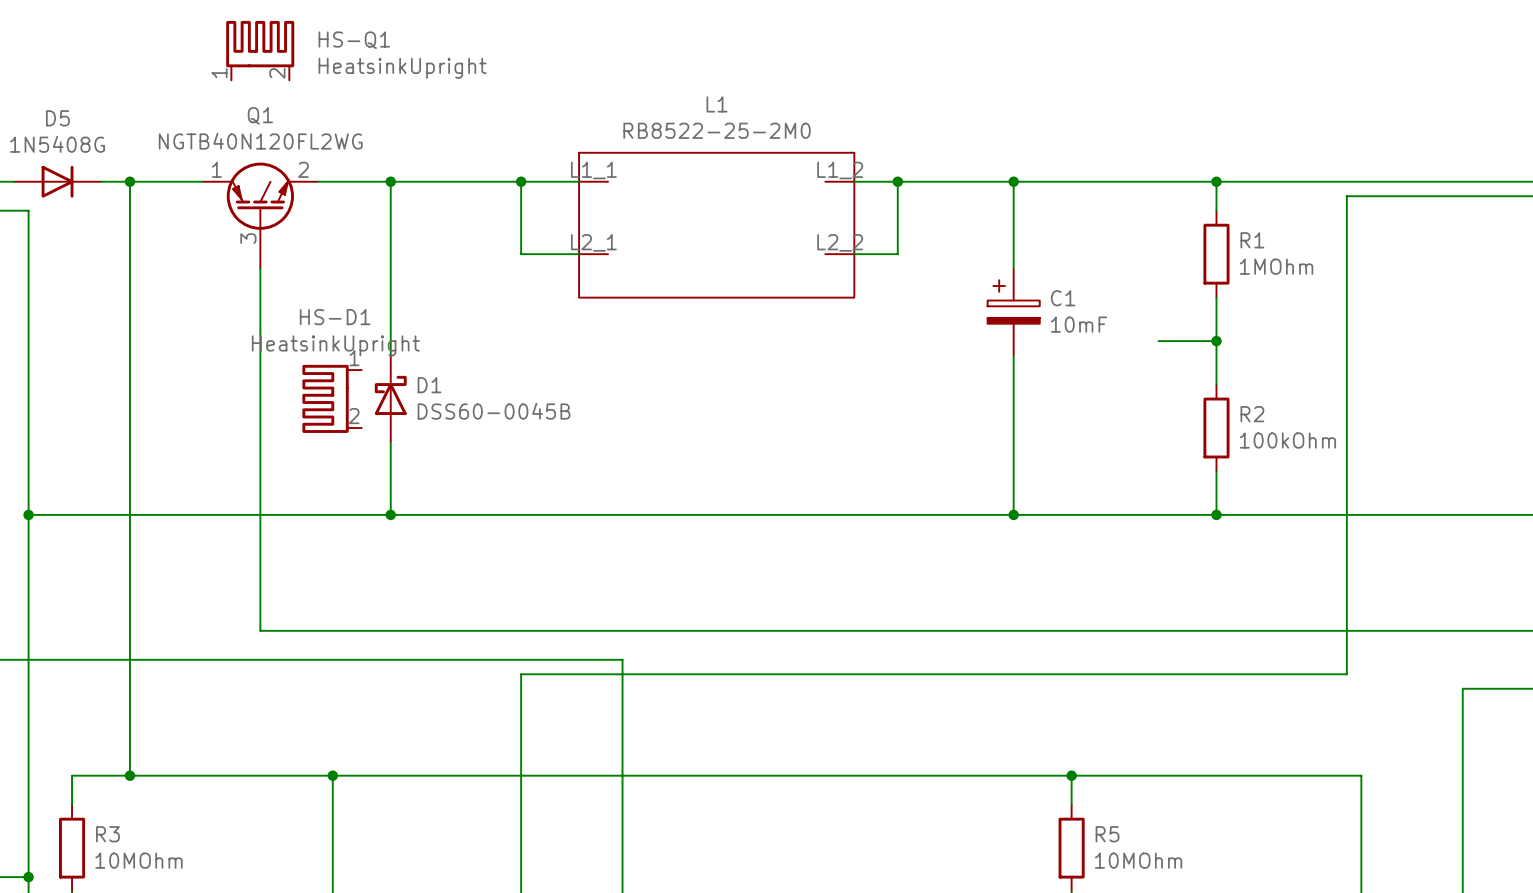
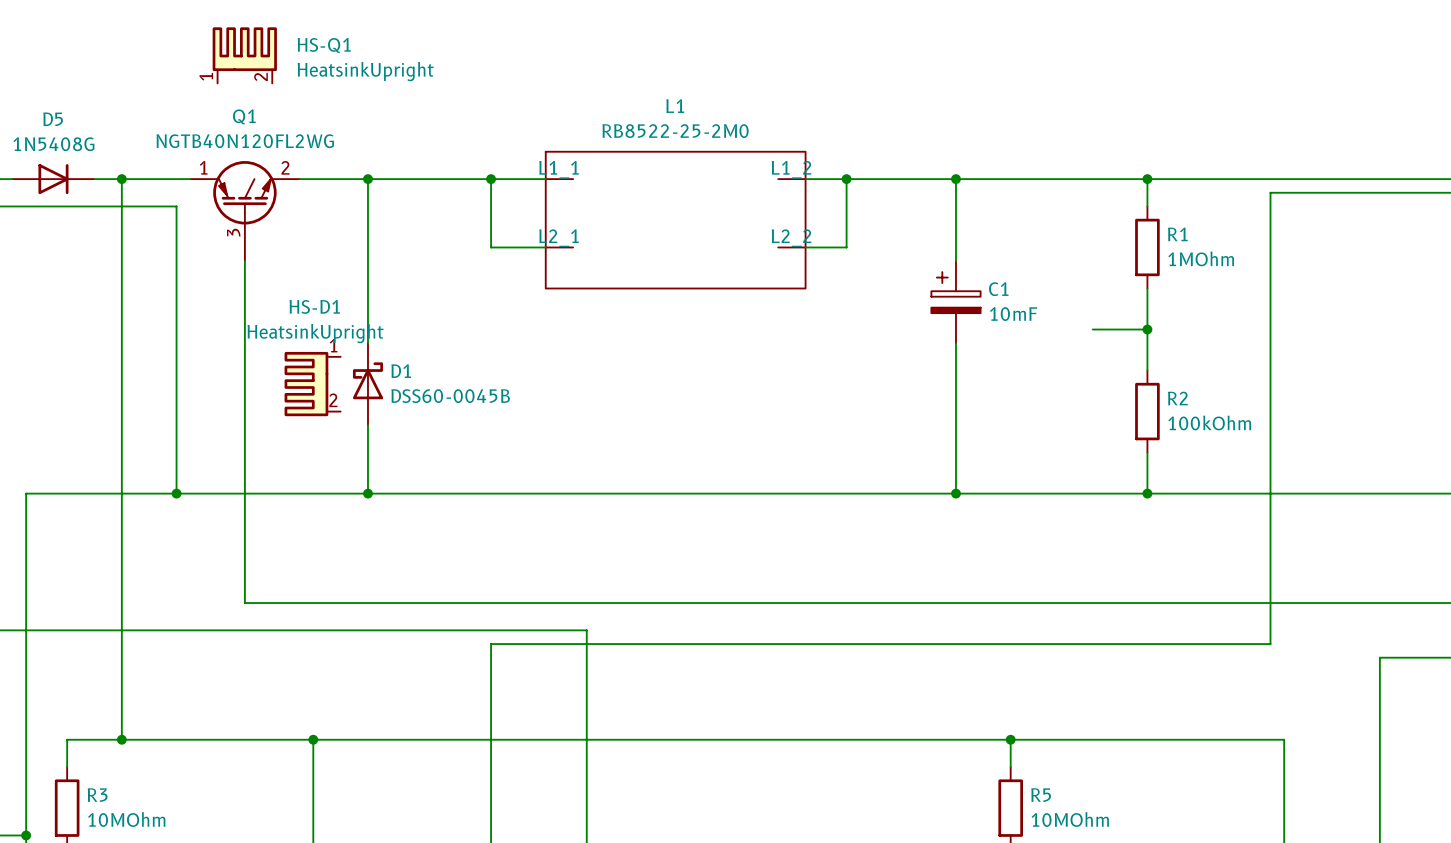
wire: (28, 210) (28, 514) -> (26, 206) (176, 206) (176, 493)
junction: (28, 514) -> none
junction: none -> (176, 493)

